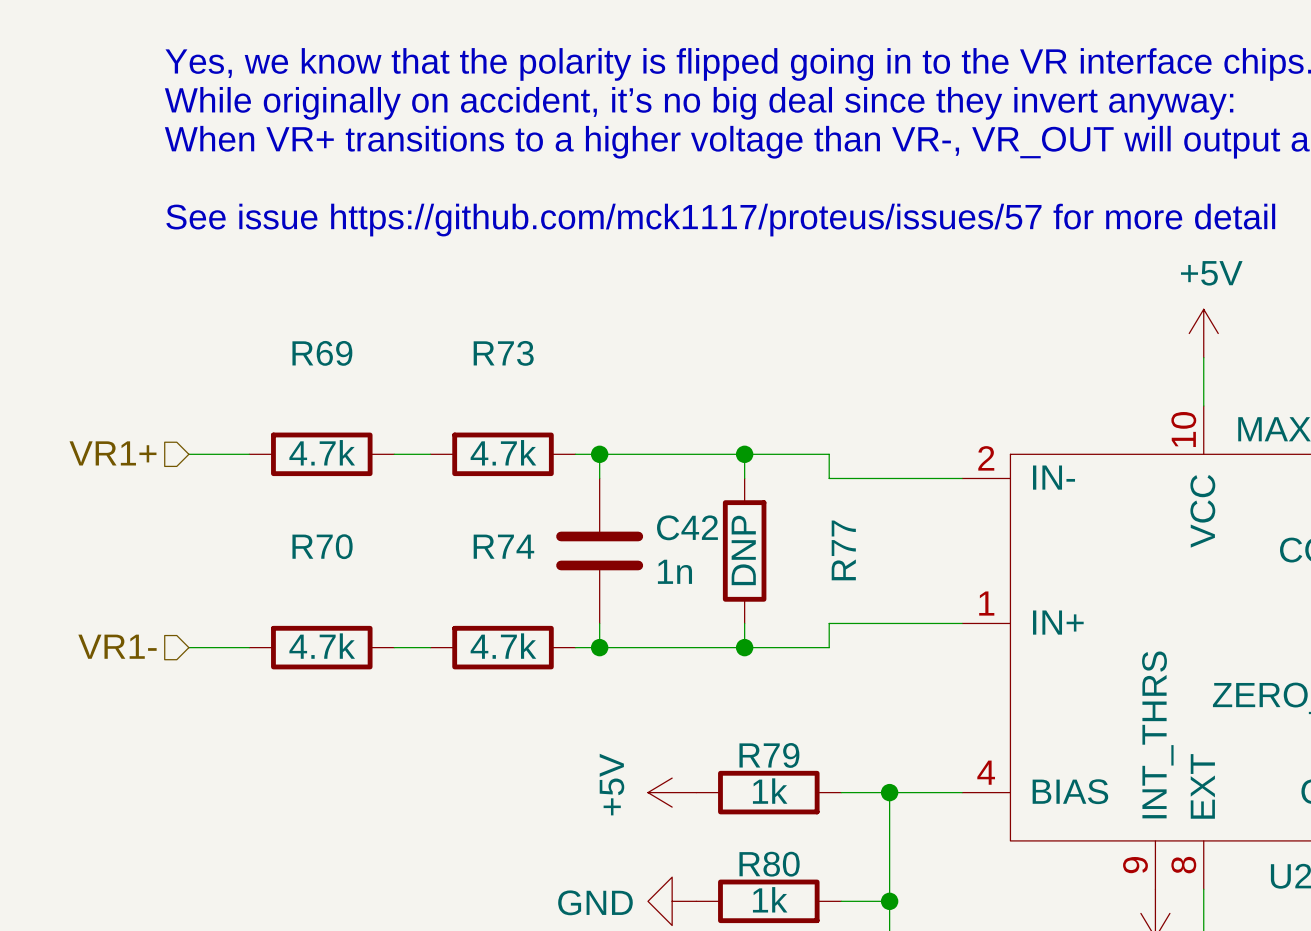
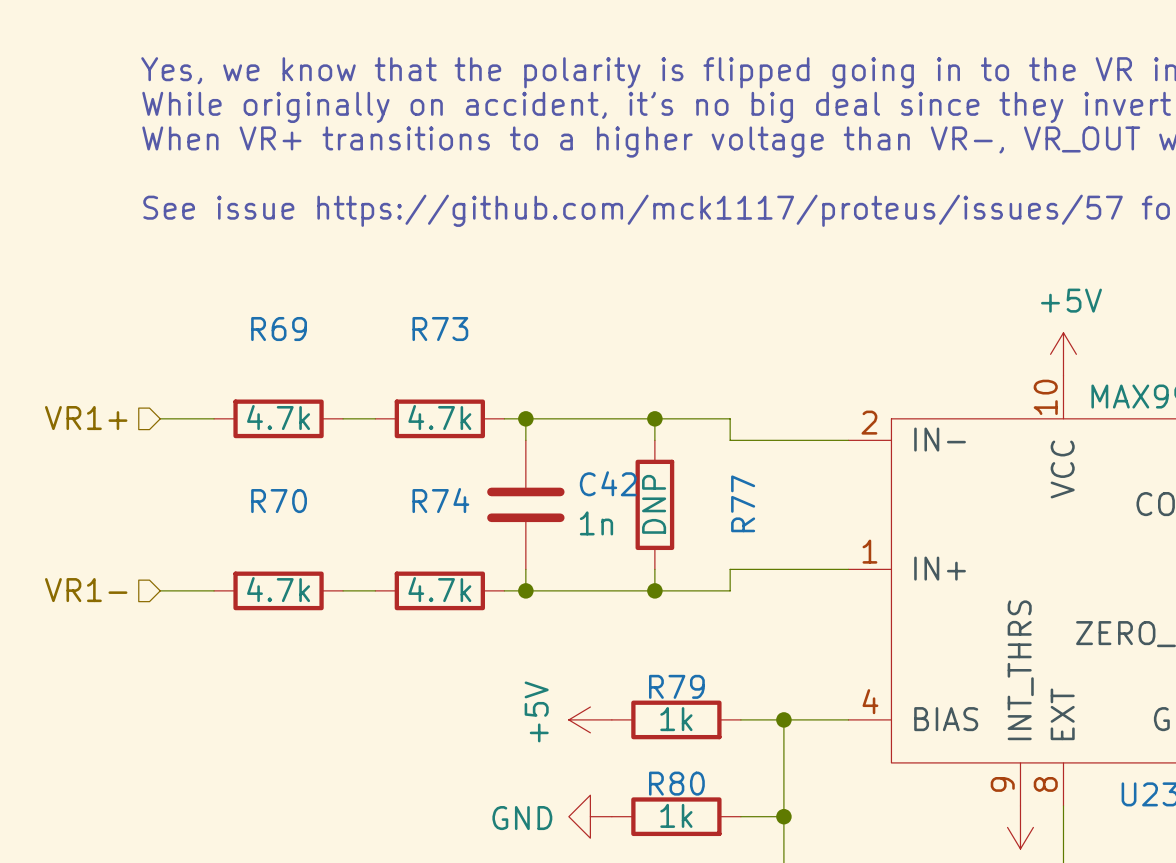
power symbol position: +5V (1203, 333) -> +5V (1063, 354)

